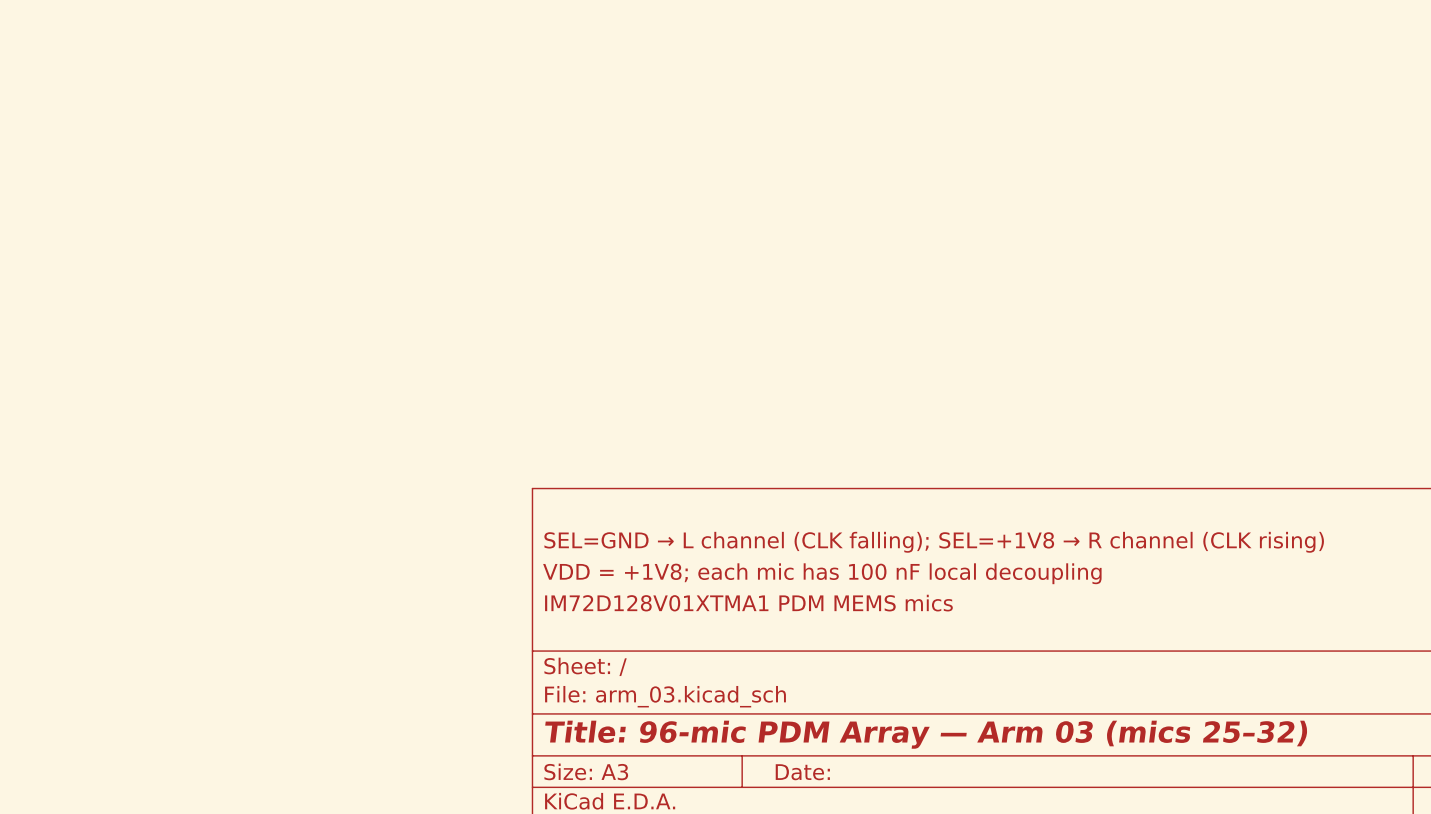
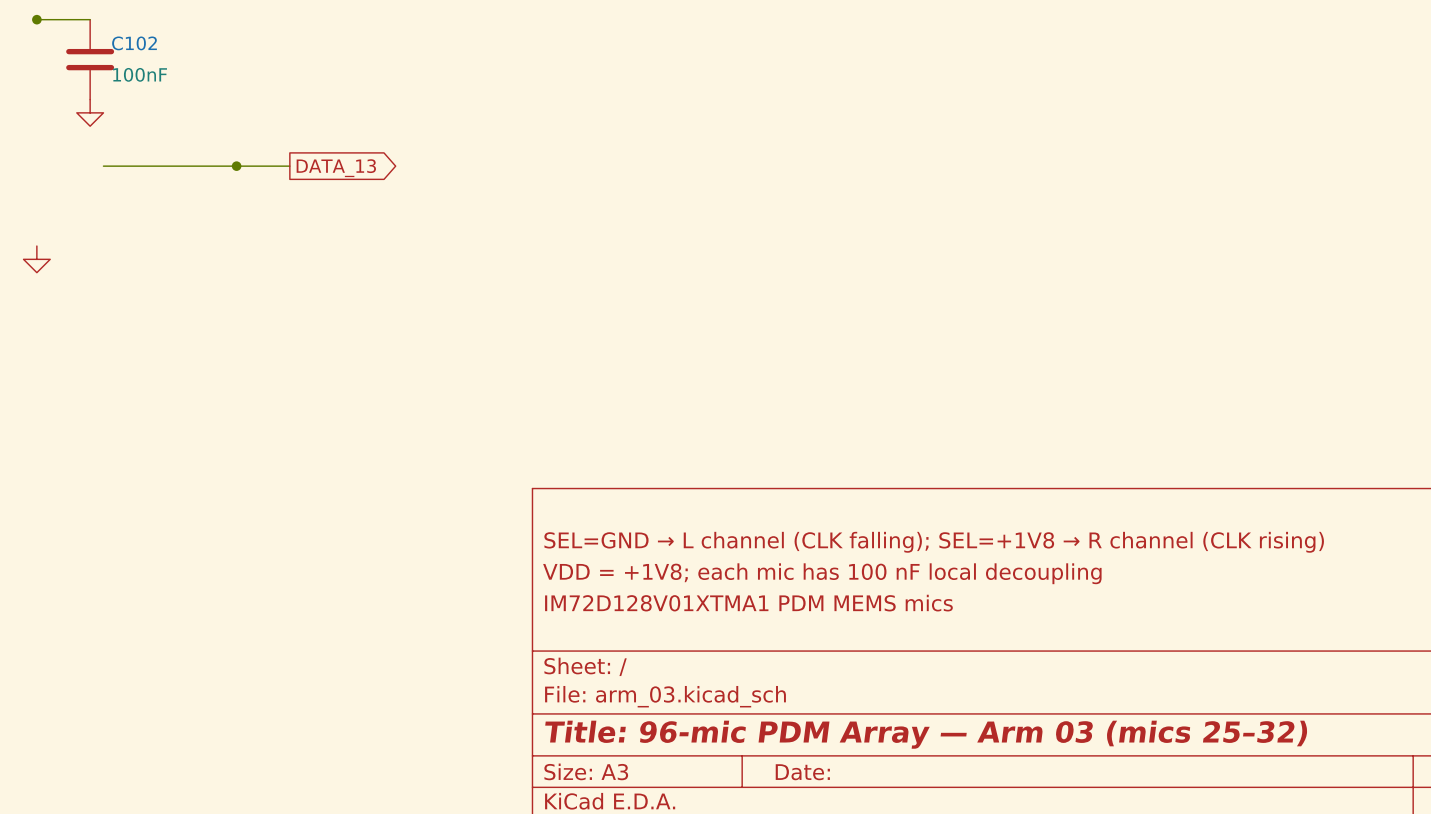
wire: none -> (36, 19) (90, 19)
junction: none -> (36, 19)
C102: none -> 100nF (90, 59)
power symbol: none -> (90, 112)
wire: none -> (103, 166) (289, 166)
junction: none -> (236, 166)
global label: none -> DATA_13 (336, 168)
power symbol: none -> (36, 259)

